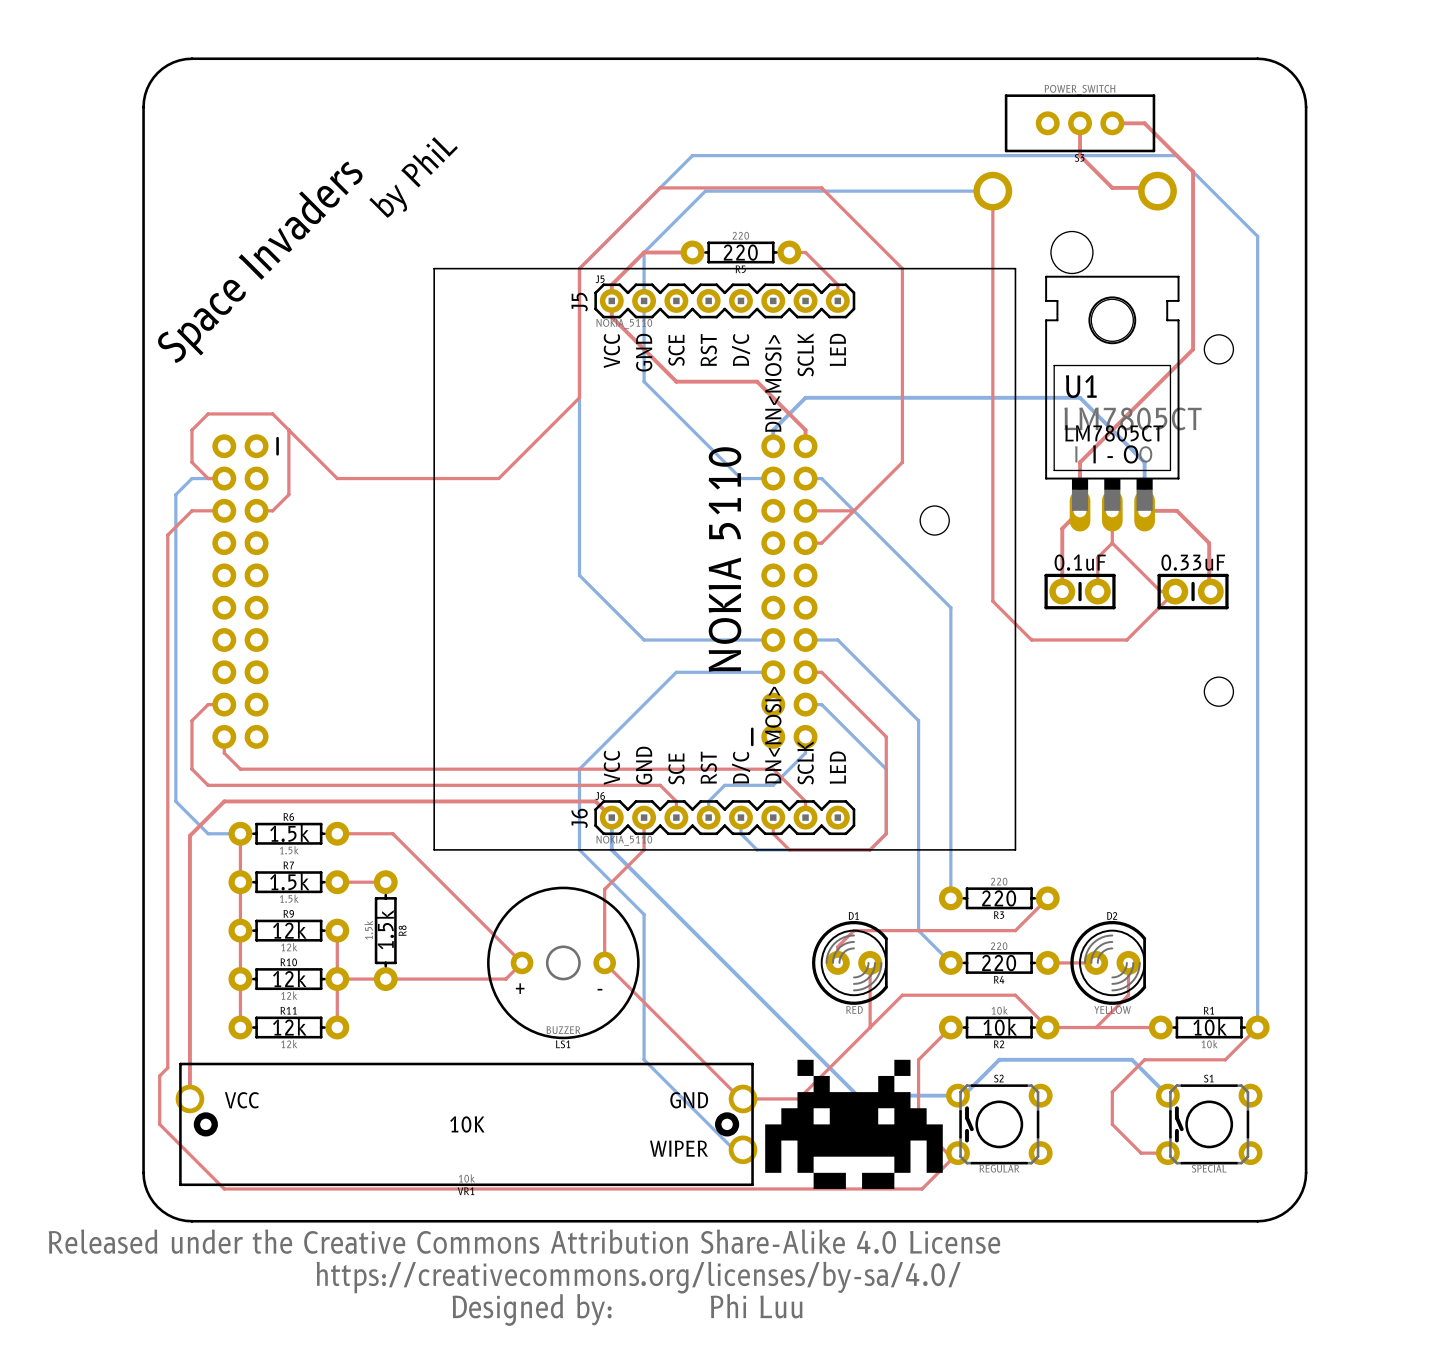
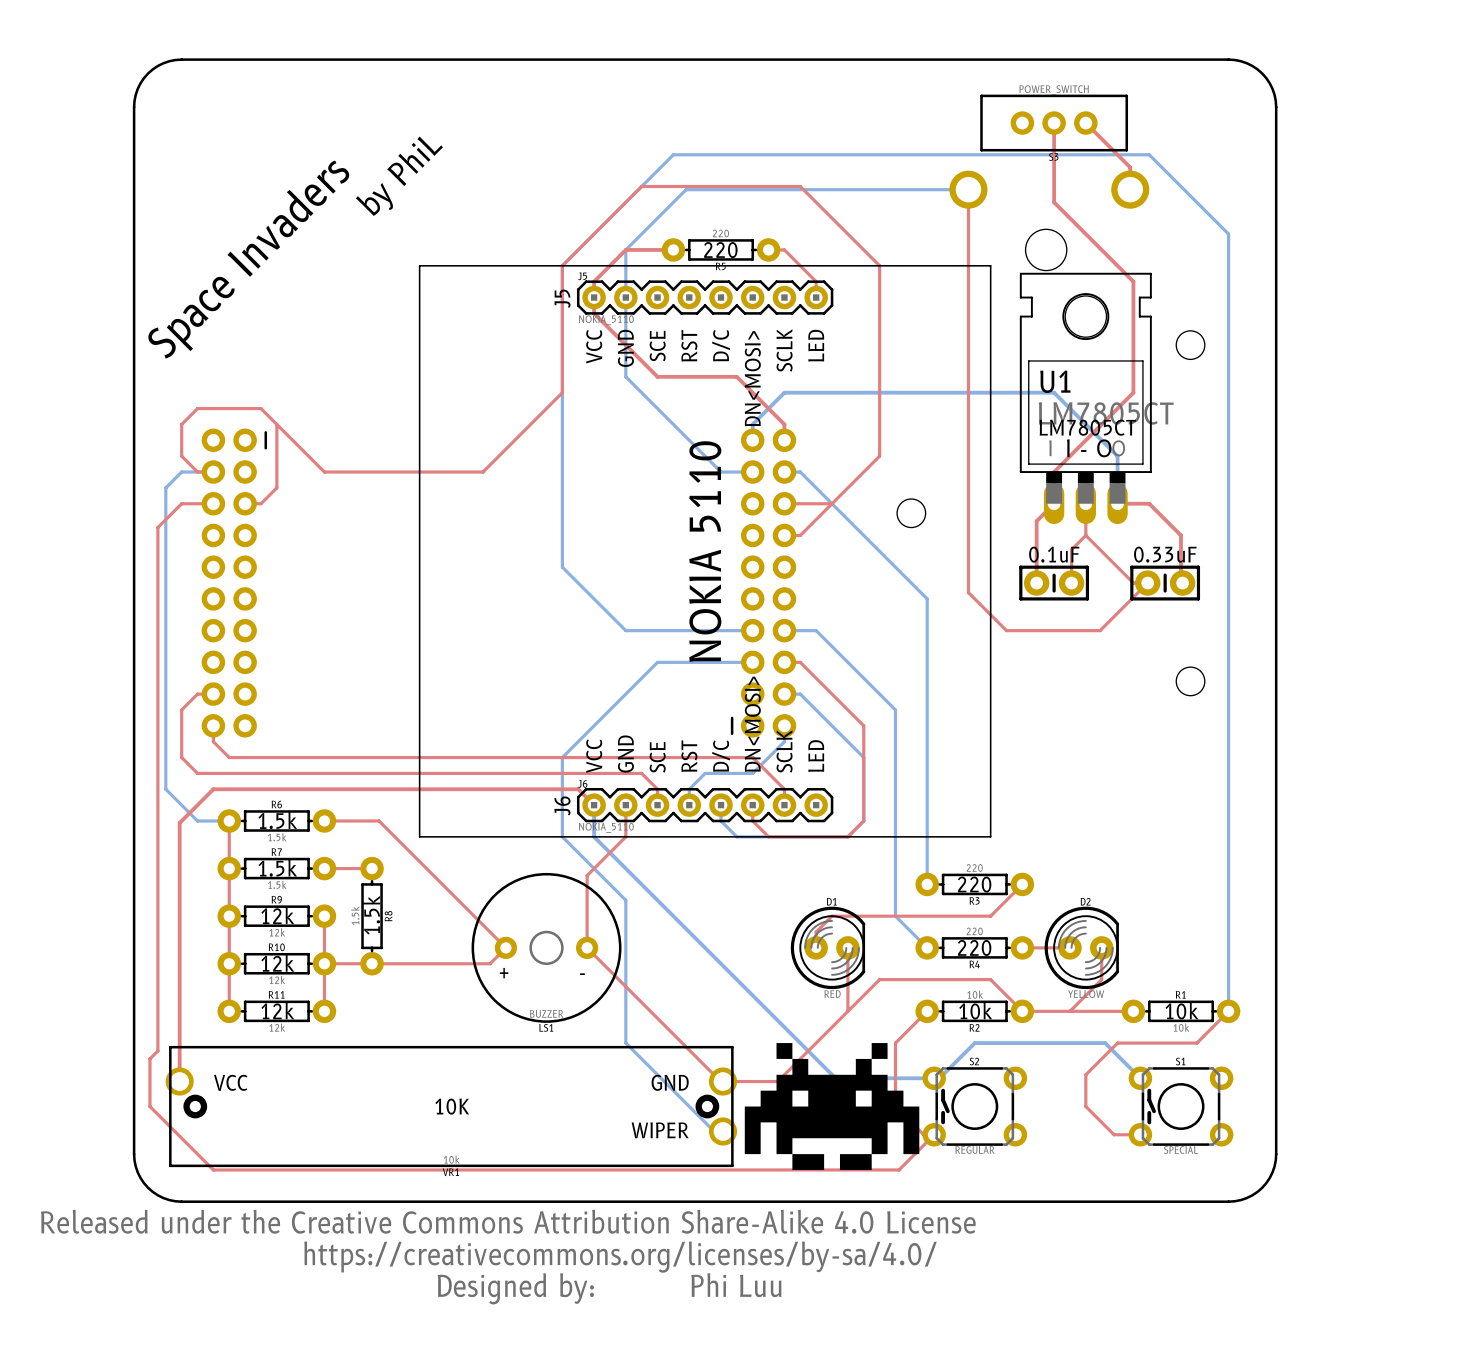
top track: (1112, 123) (1144, 123) (1193, 171) (1193, 349) (1080, 462) (1080, 478) -> (1054, 154) (1054, 202) (1133, 281) (1133, 392) (1054, 472)
top track: (1080, 155) (1112, 187) (1154, 187) (1157, 191) -> (1085, 123) (1130, 167) (1130, 189)

